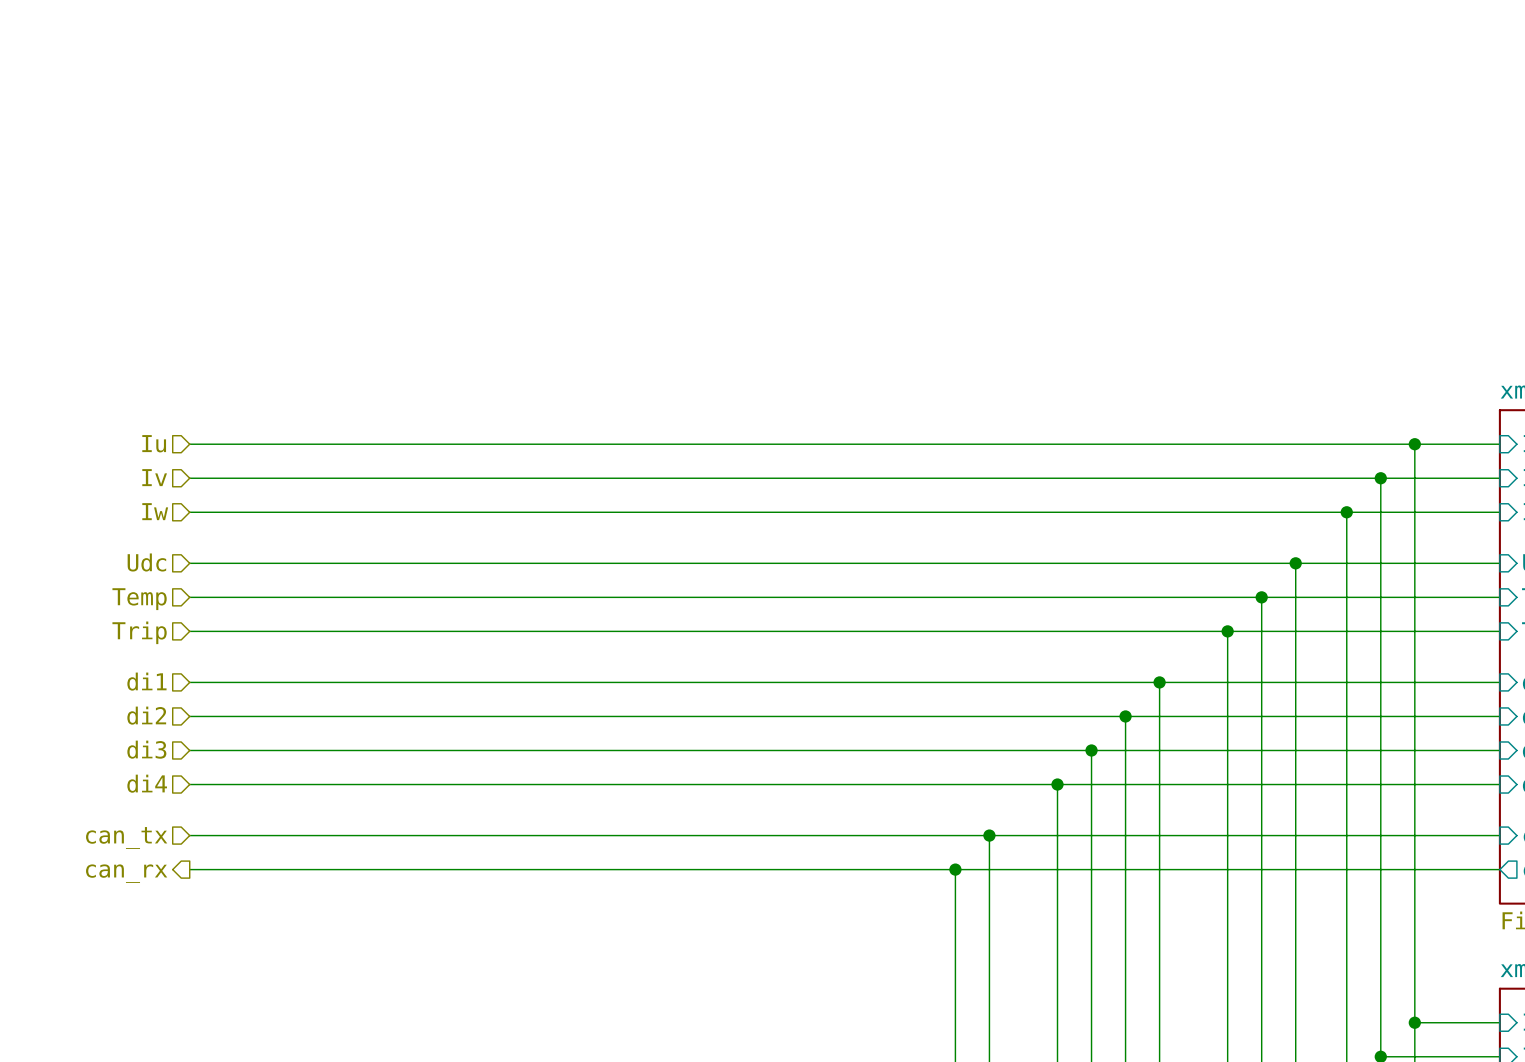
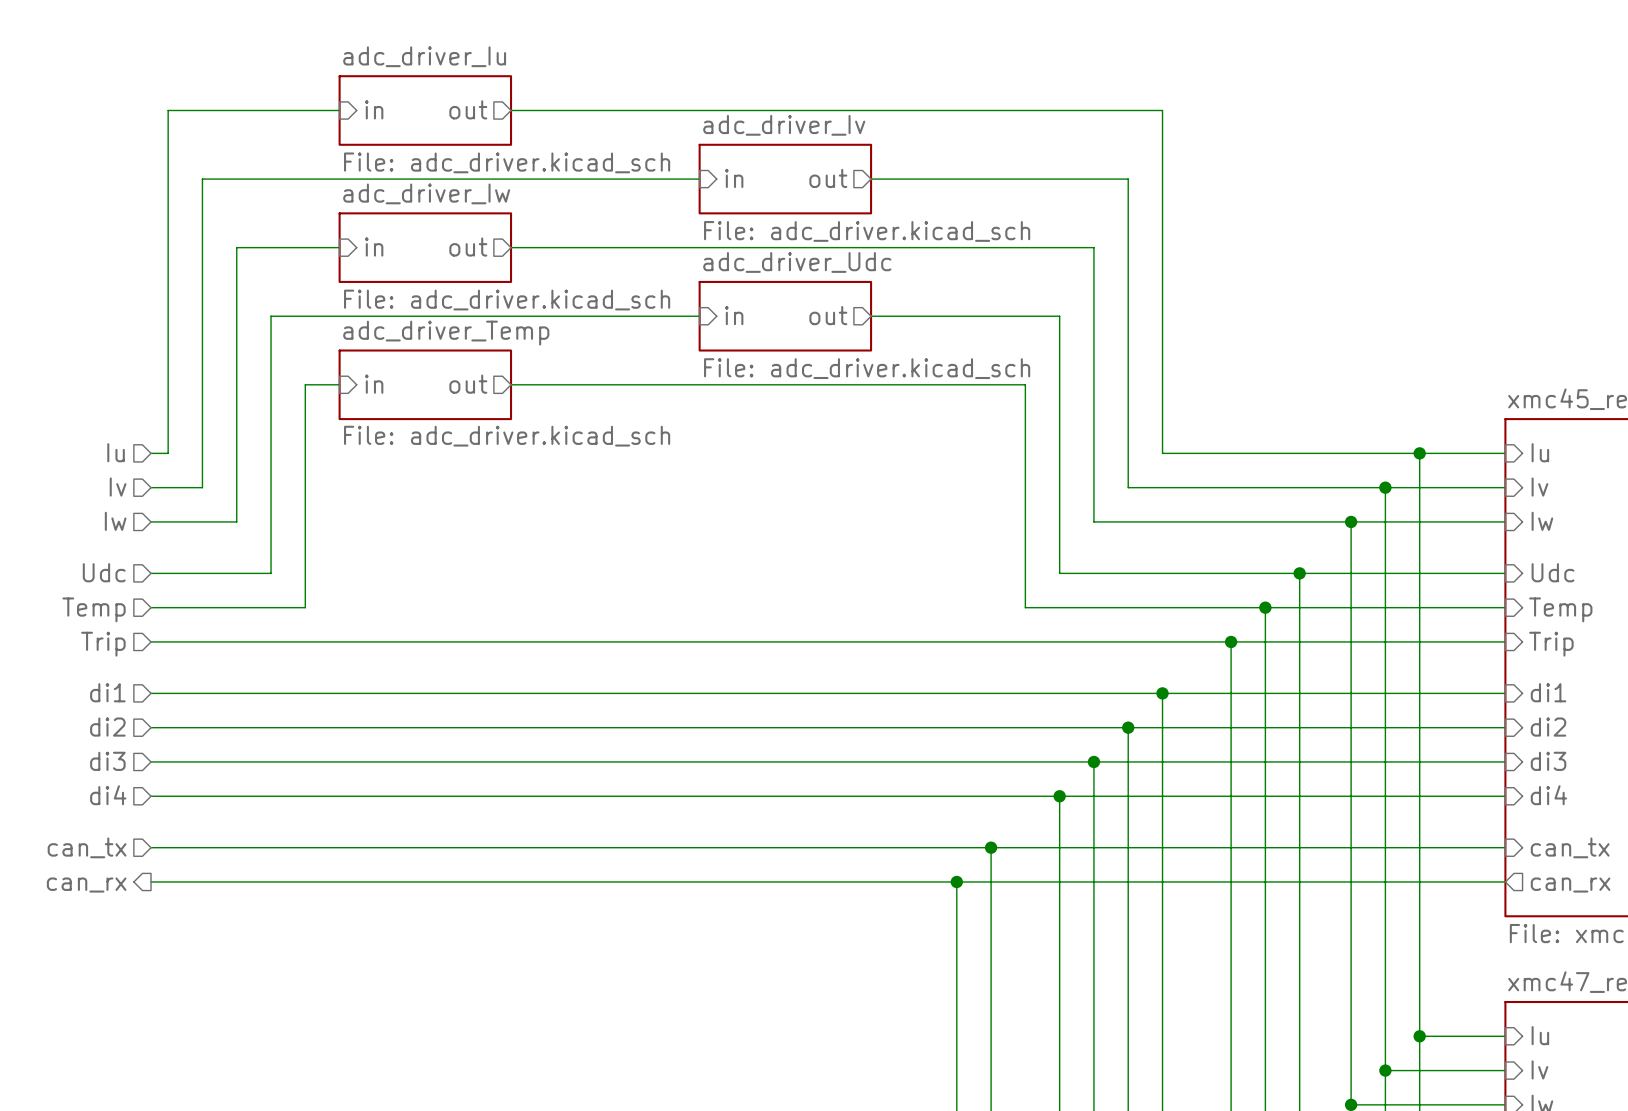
sheet pin: none -> in (374, 109)
wire: none -> (339, 110) (168, 110) (168, 453) (151, 453)
sheet adc_driver_Iu: none -> File: adc_driver.kicad_sch (425, 110)
sheet pin: none -> out (468, 109)
sheet pin: none -> in (734, 178)
sheet adc_driver_Iv: none -> File: adc_driver.kicad_sch (785, 179)
sheet pin: none -> out (828, 178)
wire: none -> (871, 179) (1128, 179) (1128, 487)
sheet pin: none -> in (374, 247)
sheet pin: none -> out (468, 247)
wire: none -> (339, 247) (236, 247) (236, 521)
sheet adc_driver_Iw: none -> File: adc_driver.kicad_sch (425, 247)
sheet pin: none -> in (734, 315)
sheet pin: none -> out (828, 315)
sheet adc_driver_Udc: none -> File: adc_driver.kicad_sch (785, 316)
wire: none -> (871, 316) (1059, 316) (1059, 573)
sheet pin: none -> in (374, 384)
wire: none -> (339, 384) (305, 384) (305, 607)
sheet adc_driver_Temp: none -> File: adc_driver.kicad_sch (425, 384)
sheet pin: none -> out (468, 384)
hierarchical label position: Iu (154, 443) -> Iu (116, 452)
wire: (189, 444) (1159, 444) -> (511, 110) (1162, 110) (1162, 453)
hierarchical label position: Iv (154, 477) -> Iv (118, 487)
wire: none -> (151, 487) (185, 487)
wire: (206, 478) (1125, 478) -> (202, 487) (202, 179) (699, 179)
hierarchical label position: Iw (155, 511) -> Iw (115, 521)
wire: none -> (151, 521) (185, 521)
wire: (240, 512) (1091, 512) -> (511, 247) (1093, 247) (1093, 521)
hierarchical label position: Udc (146, 562) -> Udc (104, 572)
wire: none -> (151, 573) (185, 573)
wire: (274, 563) (1057, 563) -> (271, 573) (271, 316) (699, 316)
wire: none -> (151, 607) (185, 607)
wire: (308, 597) (1023, 597) -> (511, 384) (1025, 384) (1025, 607)
hierarchical label position: Temp (139, 599) -> Temp (94, 609)
wire: none -> (151, 641) (185, 641)
hierarchical label position: Trip (139, 632) -> Trip (103, 644)
hierarchical label position: di1 (146, 681) -> di1 (107, 692)
wire: none -> (151, 693) (185, 693)
hierarchical label position: di2 (146, 715) -> di2 (107, 727)
wire: none -> (151, 727) (185, 727)
hierarchical label position: di3 (146, 749) -> di3 (107, 761)
wire: none -> (151, 761) (185, 761)
hierarchical label position: di4 (147, 783) -> di4 (108, 795)
wire: none -> (151, 796) (185, 796)
wire: none -> (151, 847) (185, 847)
hierarchical label position: can_tx (126, 837) -> can_tx (87, 847)
wire: none -> (151, 881) (185, 881)
hierarchical label position: can_rx (126, 873) -> can_rx (86, 885)

